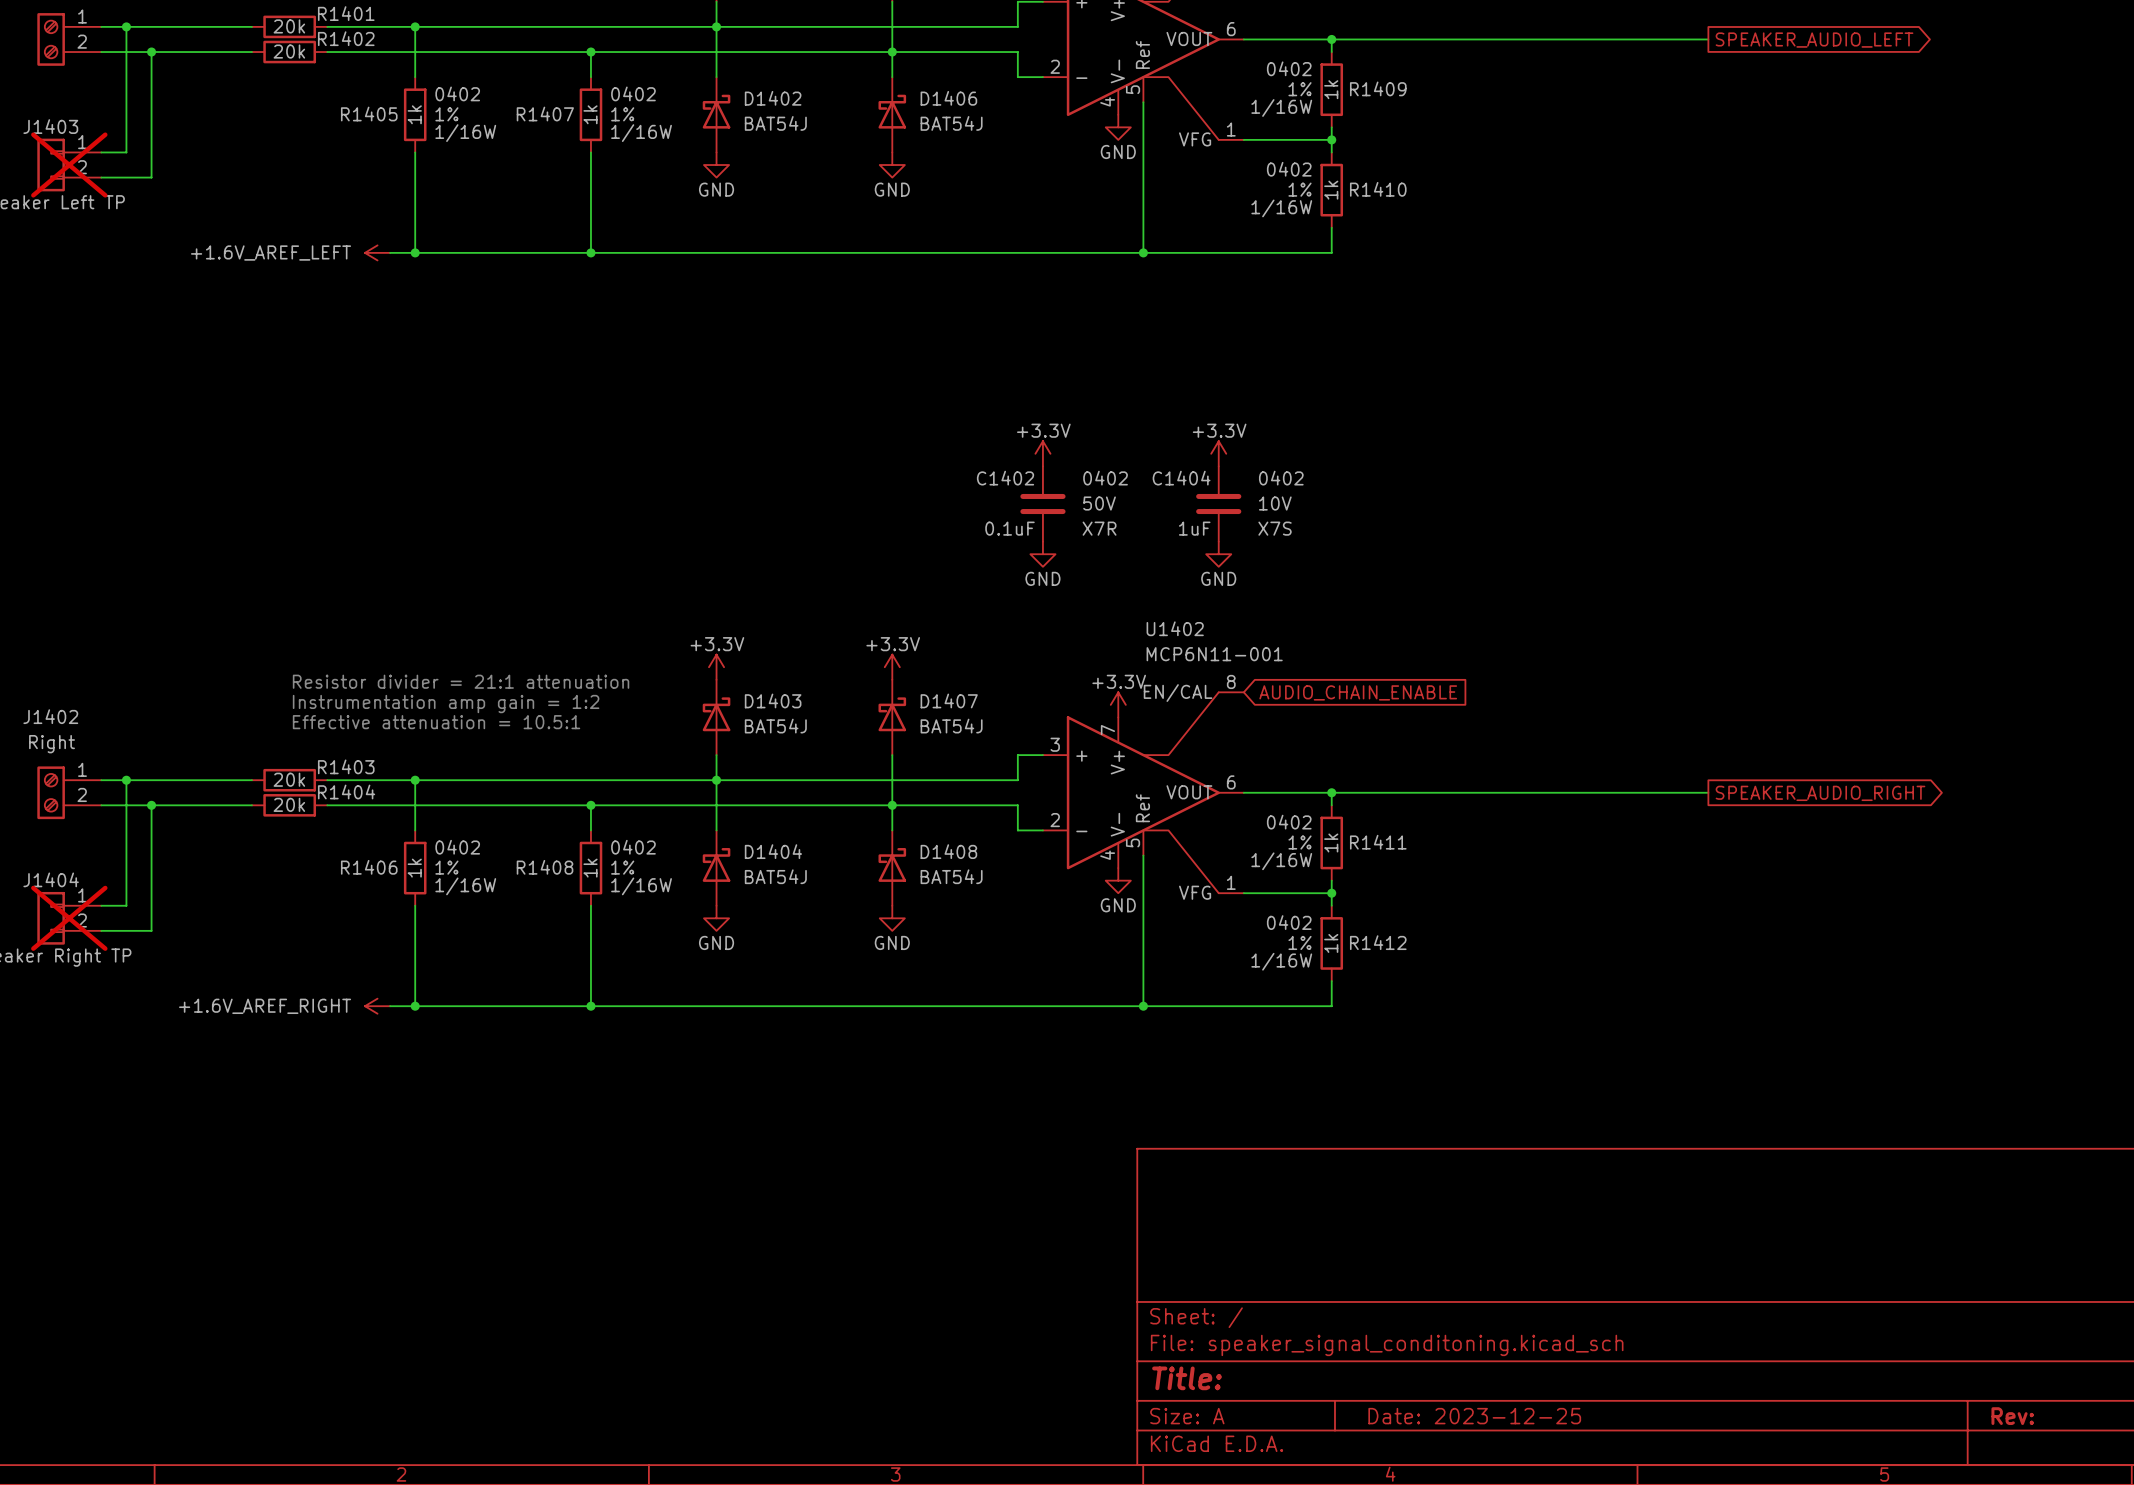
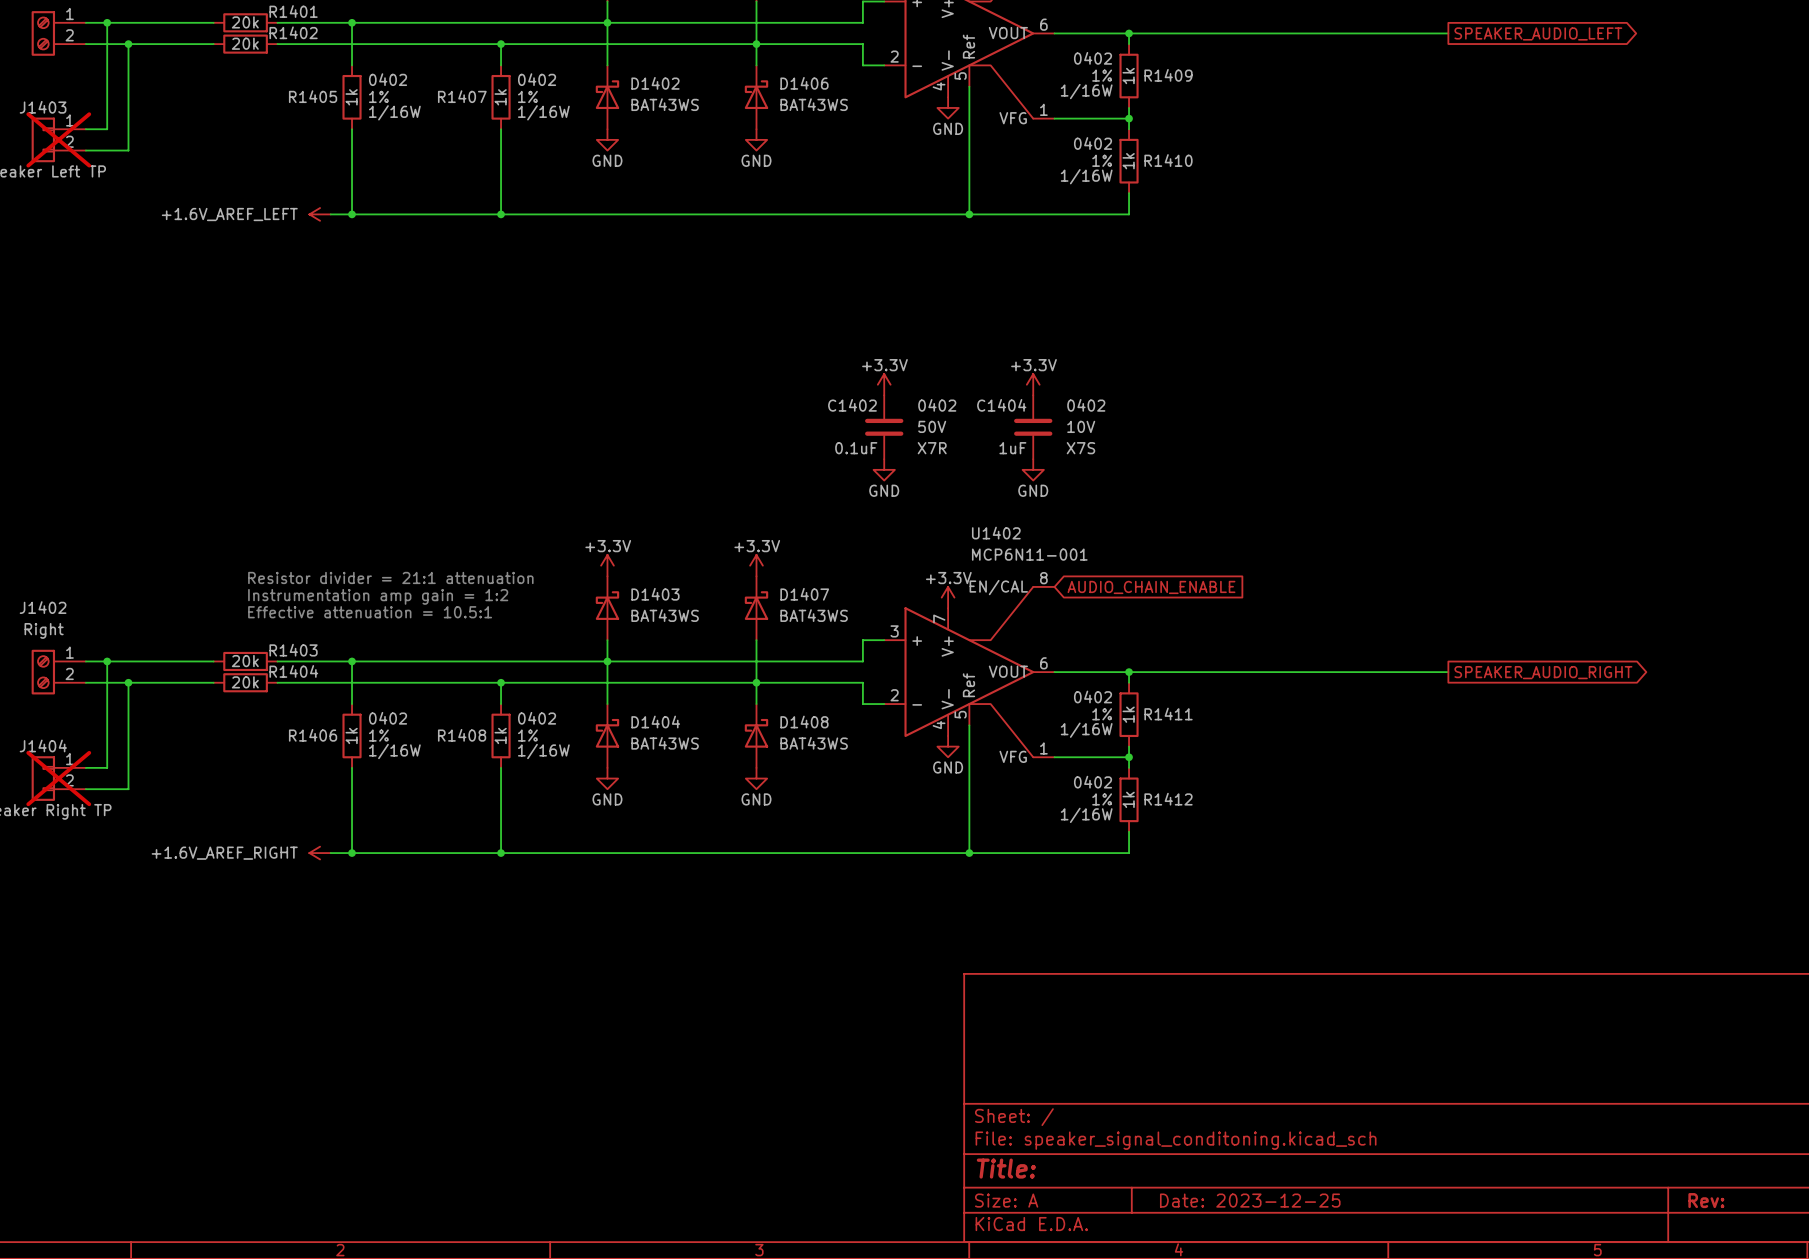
D1402 value: BAT54J (775, 123) -> BAT43WS (665, 104)
D1406 value: BAT54J (951, 123) -> BAT43WS (814, 104)
D1403 value: BAT54J (775, 726) -> BAT43WS (665, 615)
D1407 value: BAT54J (951, 726) -> BAT43WS (814, 615)
D1404 value: BAT54J (775, 876) -> BAT43WS (665, 743)
D1408 value: BAT54J (951, 876) -> BAT43WS (814, 743)

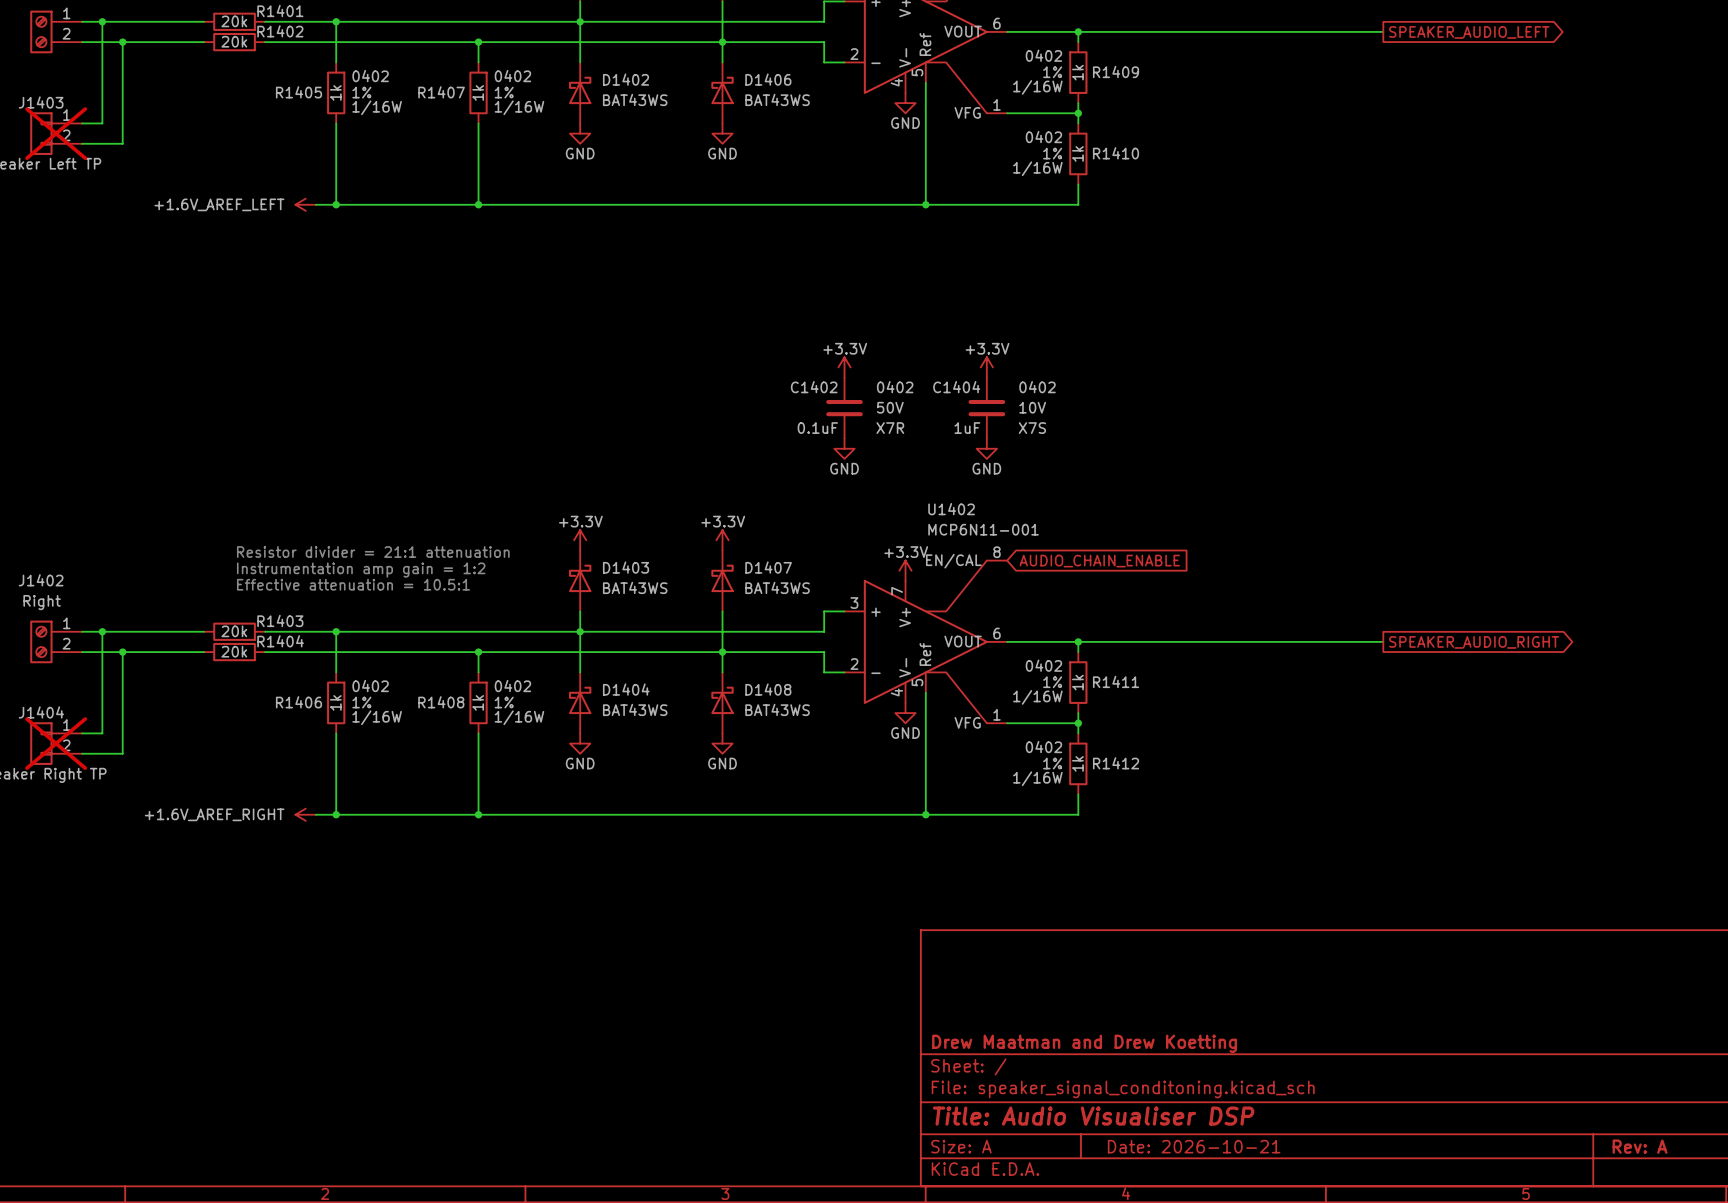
title block: none -> Drew Maatman and Drew Koetting (1084, 1043)
title block: Title: (1006, 1168) -> Title: Audio Visualiser DSP (1093, 1116)
title block: Date: 2023-12-25 (1250, 1200) -> Date: 2026-10-21 (1194, 1146)
title block: Rev: (1706, 1200) -> Rev: A (1640, 1146)

